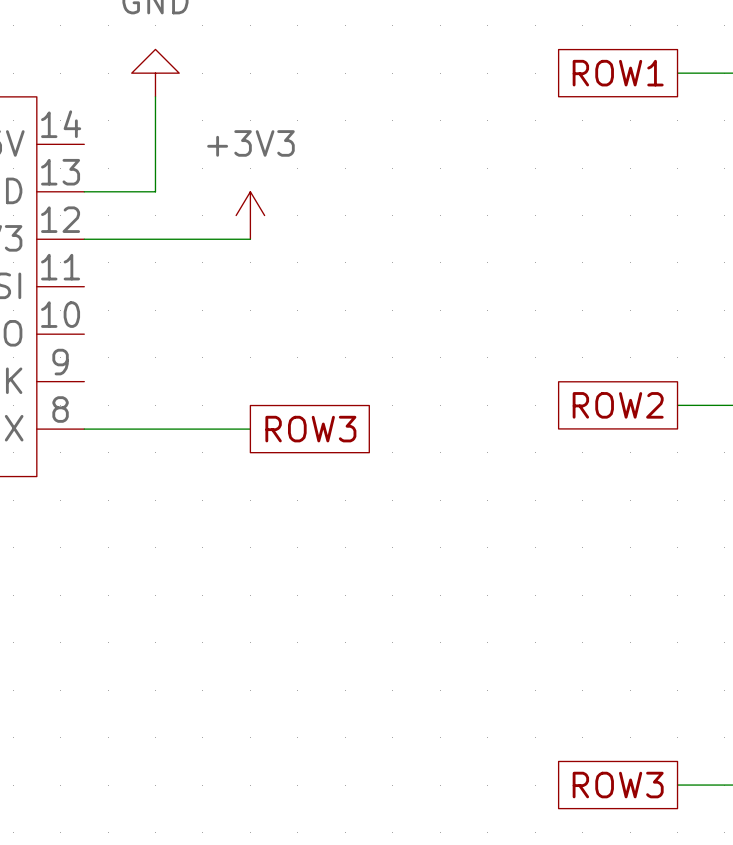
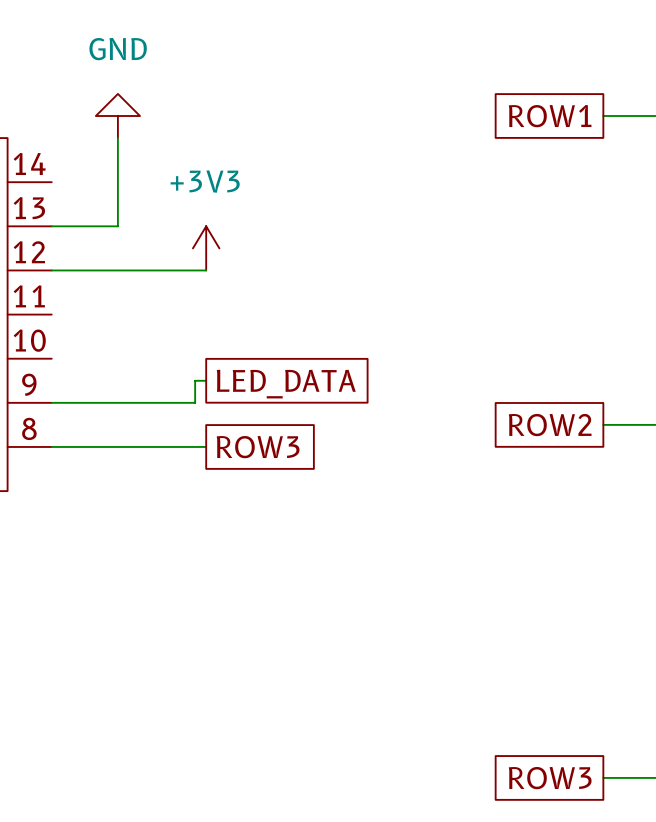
wire: none -> (206, 380) (195, 380) (195, 402) (51, 402)
global label: none -> LED_DATA (286, 384)

